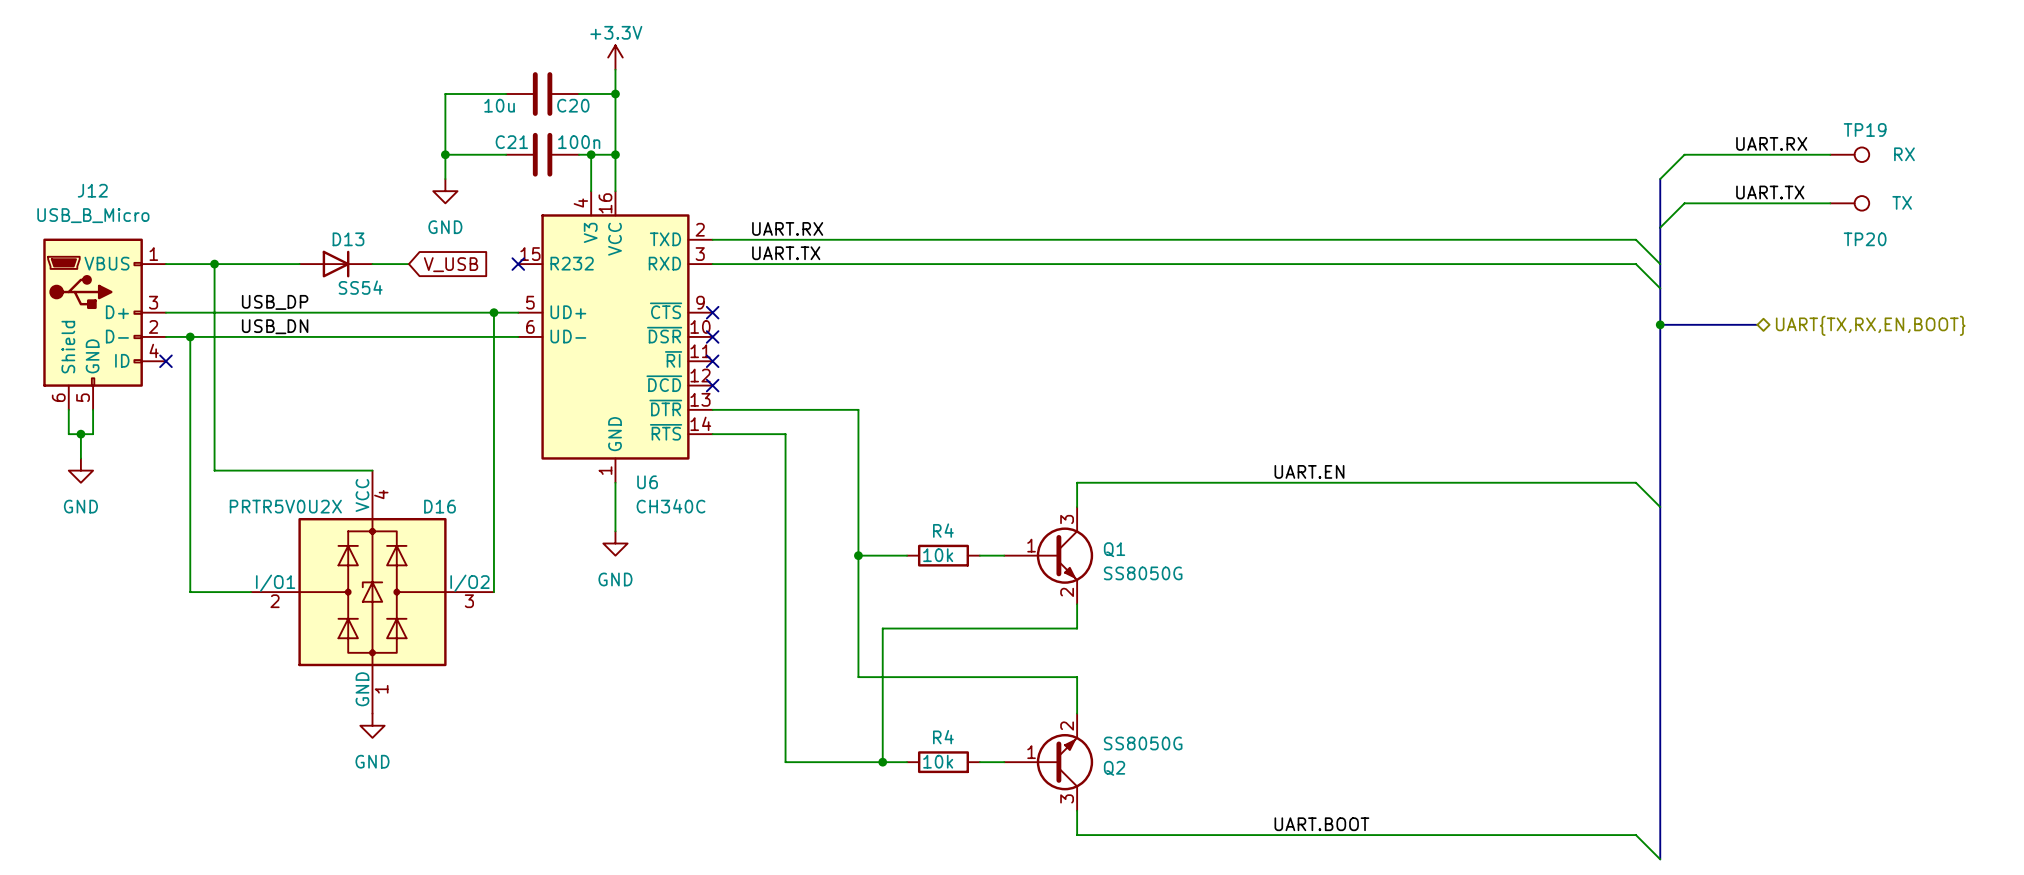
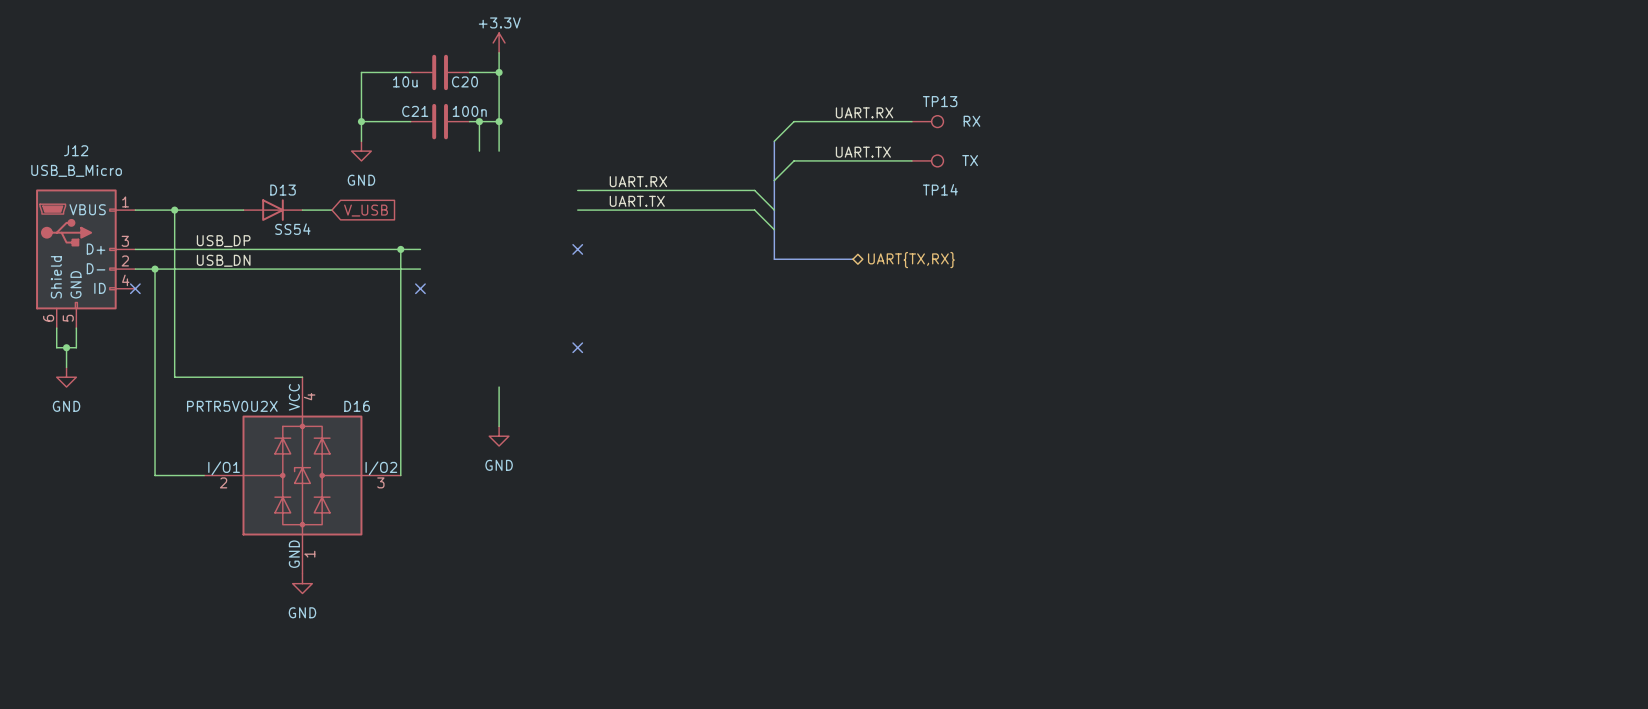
label: none -> UART.RX (864, 112)
label: UART.RX (1771, 143) -> none
wire: none -> (911, 121) (794, 121) (774, 141)
TP13: none -> RX (927, 121)
wire: (1830, 154) (1684, 154) (1660, 179) -> none
TP19: RX (1849, 154) -> none
bus: none -> (774, 141) (774, 259) (852, 259)
bus: (1660, 179) (1660, 859) -> none
label: none -> UART.TX (863, 152)
label: UART.TX (1770, 192) -> none
wire: none -> (911, 160) (794, 160) (774, 180)
TP14: none -> TX (927, 160)
wire: (1830, 203) (1684, 203) (1660, 227) -> none
TP20: TX (1849, 203) -> none
wire: (931, 239) (1635, 239) (1660, 264) -> (754, 190) (774, 210)
no-connect mark: (518, 264) -> none
wire: (931, 264) (1635, 264) (1660, 288) -> (754, 210) (774, 229)
bus: (1660, 324) (1757, 324) -> none
junction: (1660, 324) -> none
hierarchical label: none -> UART{TX,RX} (911, 260)
hierarchical label: UART{TX,RX,EN,BOOT} (1870, 325) -> none
U6: CH340C (615, 336) -> none
no-connect mark: (712, 336) -> none
no-connect mark: none -> (420, 288)
no-connect mark: (712, 361) -> none
no-connect mark: (712, 385) -> none
wire: (712, 409) (858, 409) (858, 677) (1077, 677) (1077, 713) -> none
wire: (712, 434) (785, 434) (785, 762) (907, 762) -> none
no-connect mark: none -> (577, 347)
label: UART.EN (1309, 471) -> none
wire: (1077, 507) (1077, 482) (1635, 482) (1660, 507) -> none
wire: (858, 555) (907, 555) -> none
junction: (858, 555) -> none
R4: 10k (943, 555) -> none
wire: (979, 555) (1004, 555) -> none
Q1: SS8050G (1048, 555) -> none
wire: (1077, 604) (1077, 628) (882, 628) (882, 762) -> none
junction: (882, 762) -> none
R4: 10k (943, 762) -> none
wire: (979, 762) (1004, 762) -> none
Q2: SS8050G (1048, 762) -> none
wire: (1077, 810) (1077, 835) (1635, 835) (1660, 859) -> none
label: UART.BOOT (1321, 824) -> none

